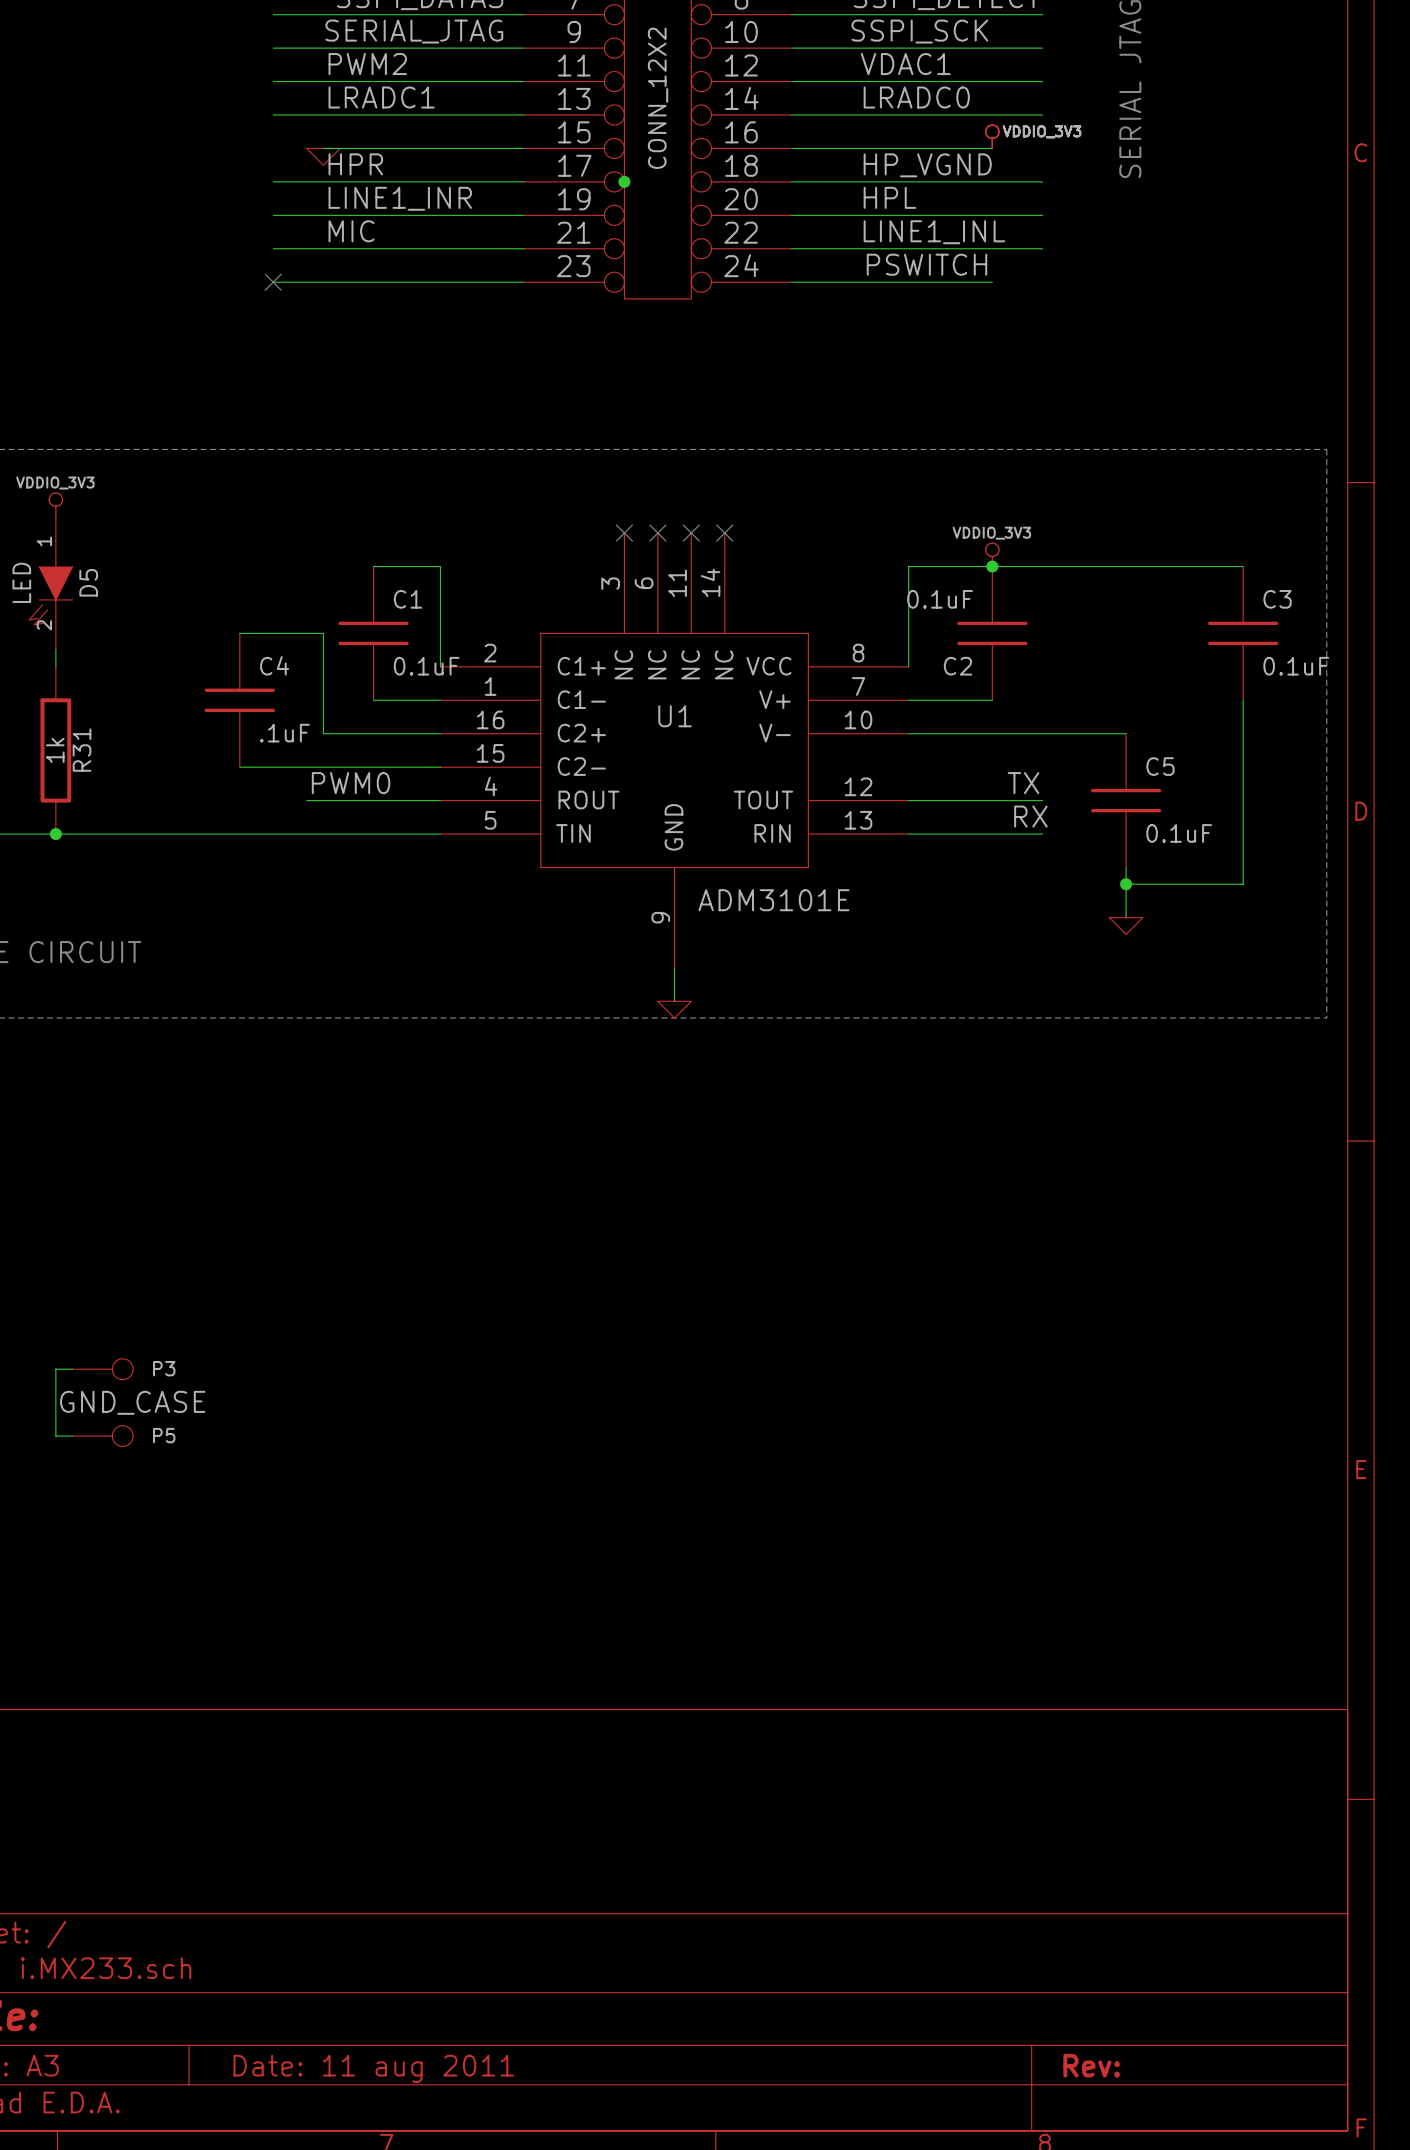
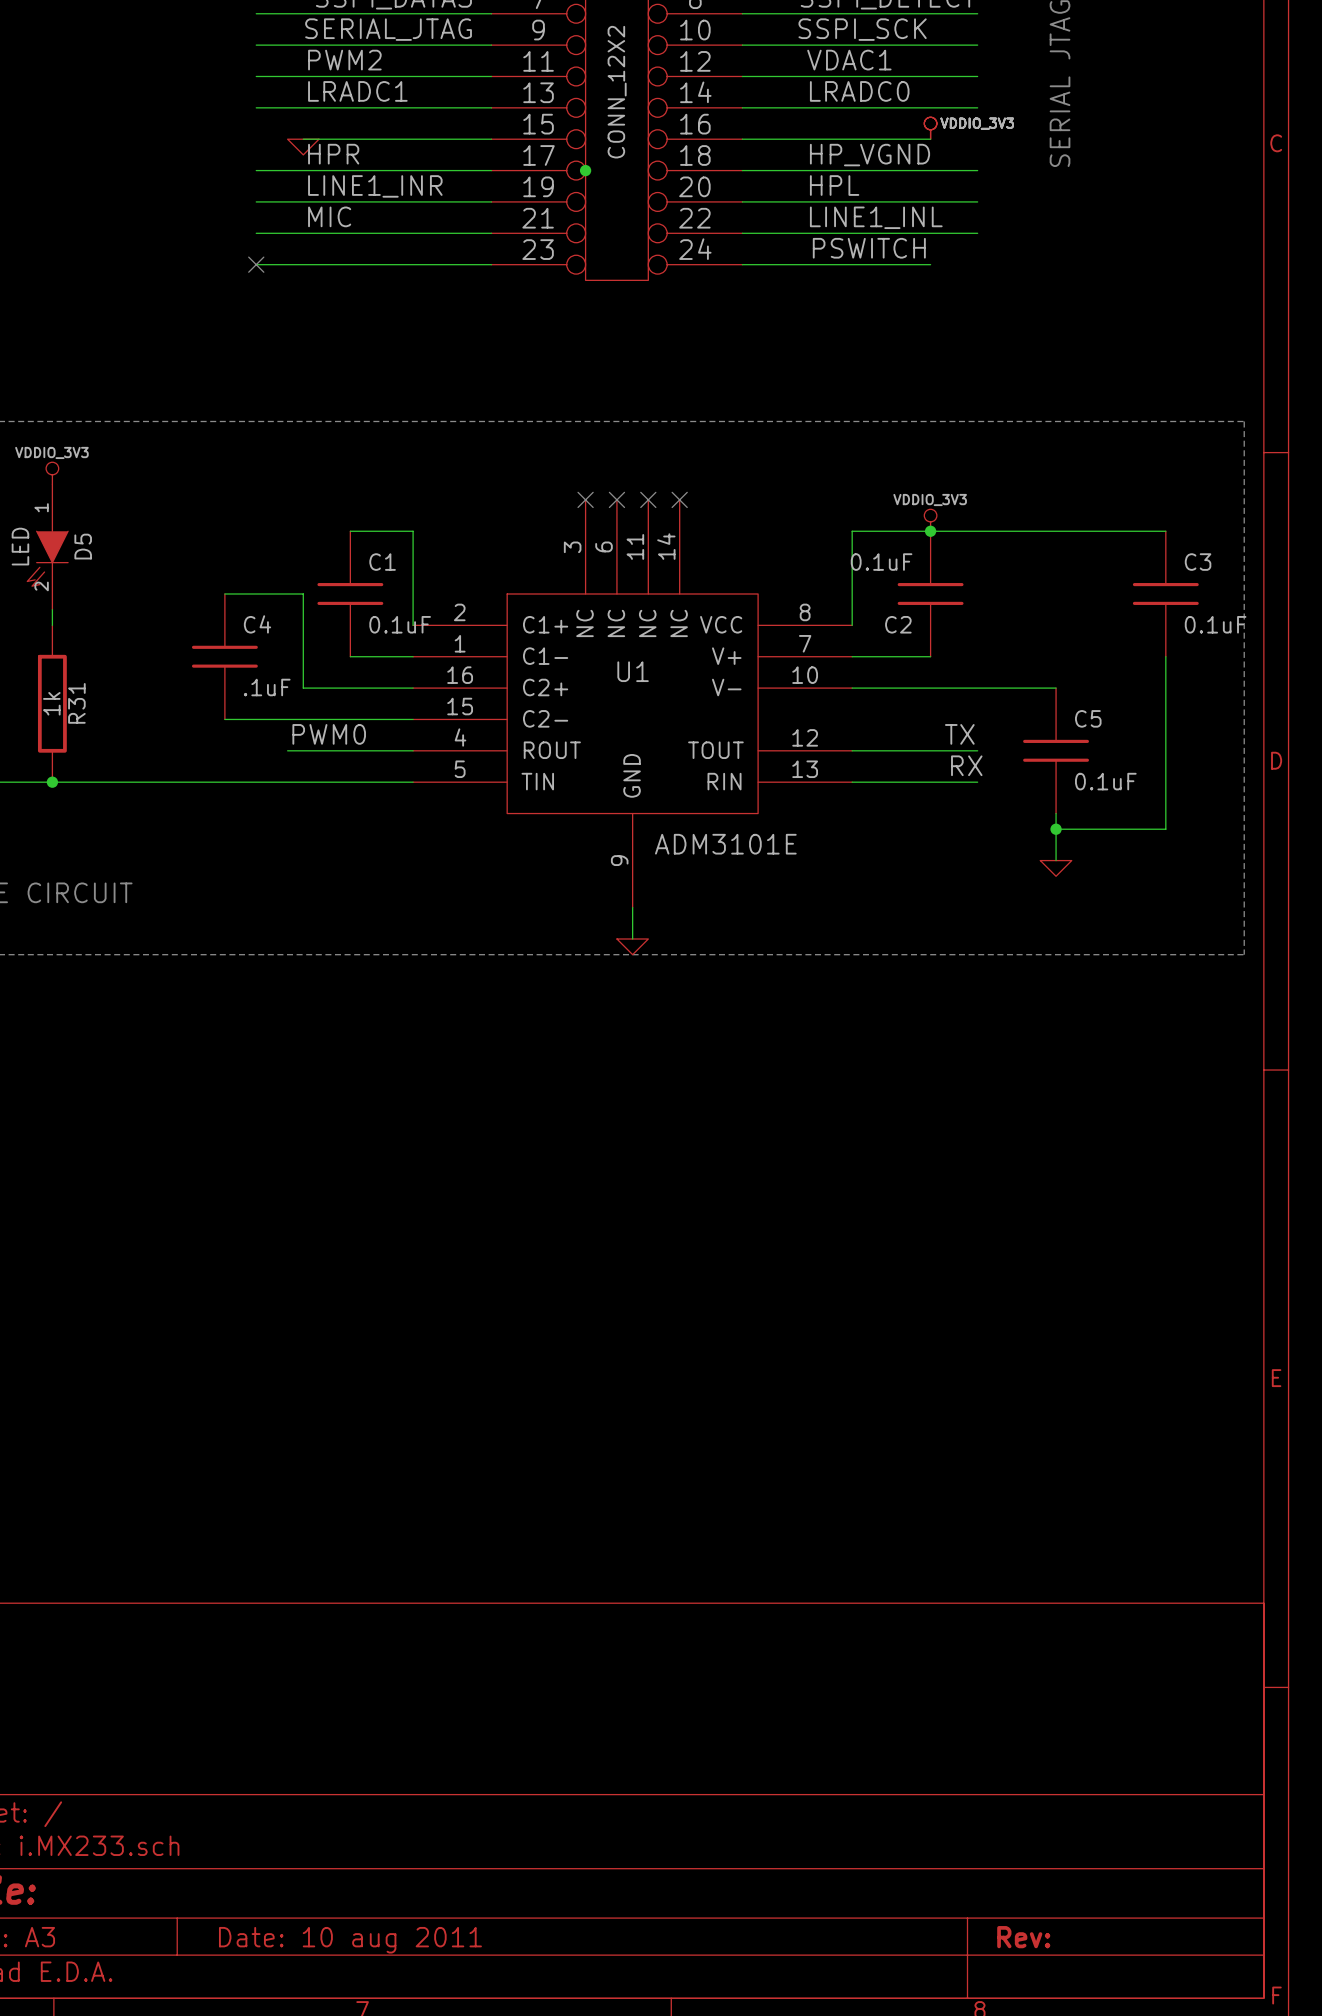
wire: (72, 1369) (55, 1369) (55, 1436) (72, 1436) -> none
P3: (102, 1369) -> none
label: GND_CASE (132, 1402) -> none
P5: (102, 1436) -> none
title block: Date: 11 aug 2011 (373, 2068) -> Date: 10 aug 2011 (350, 1940)

